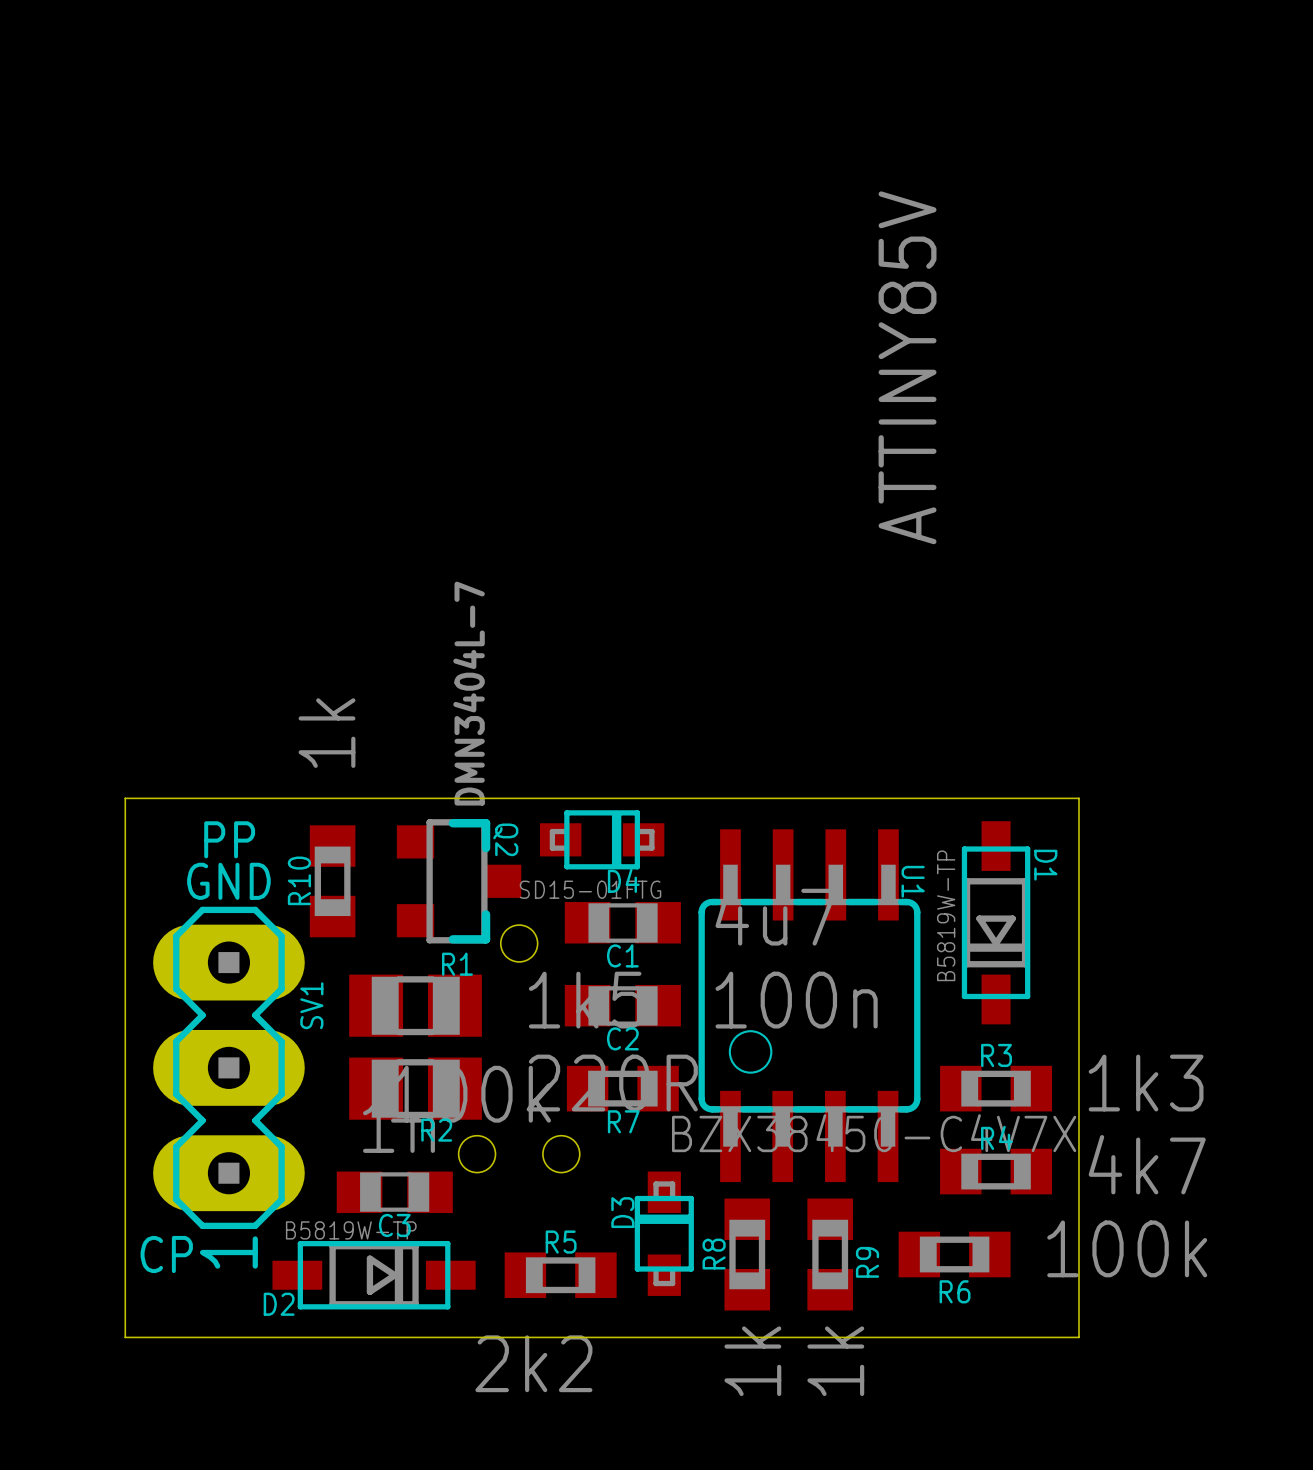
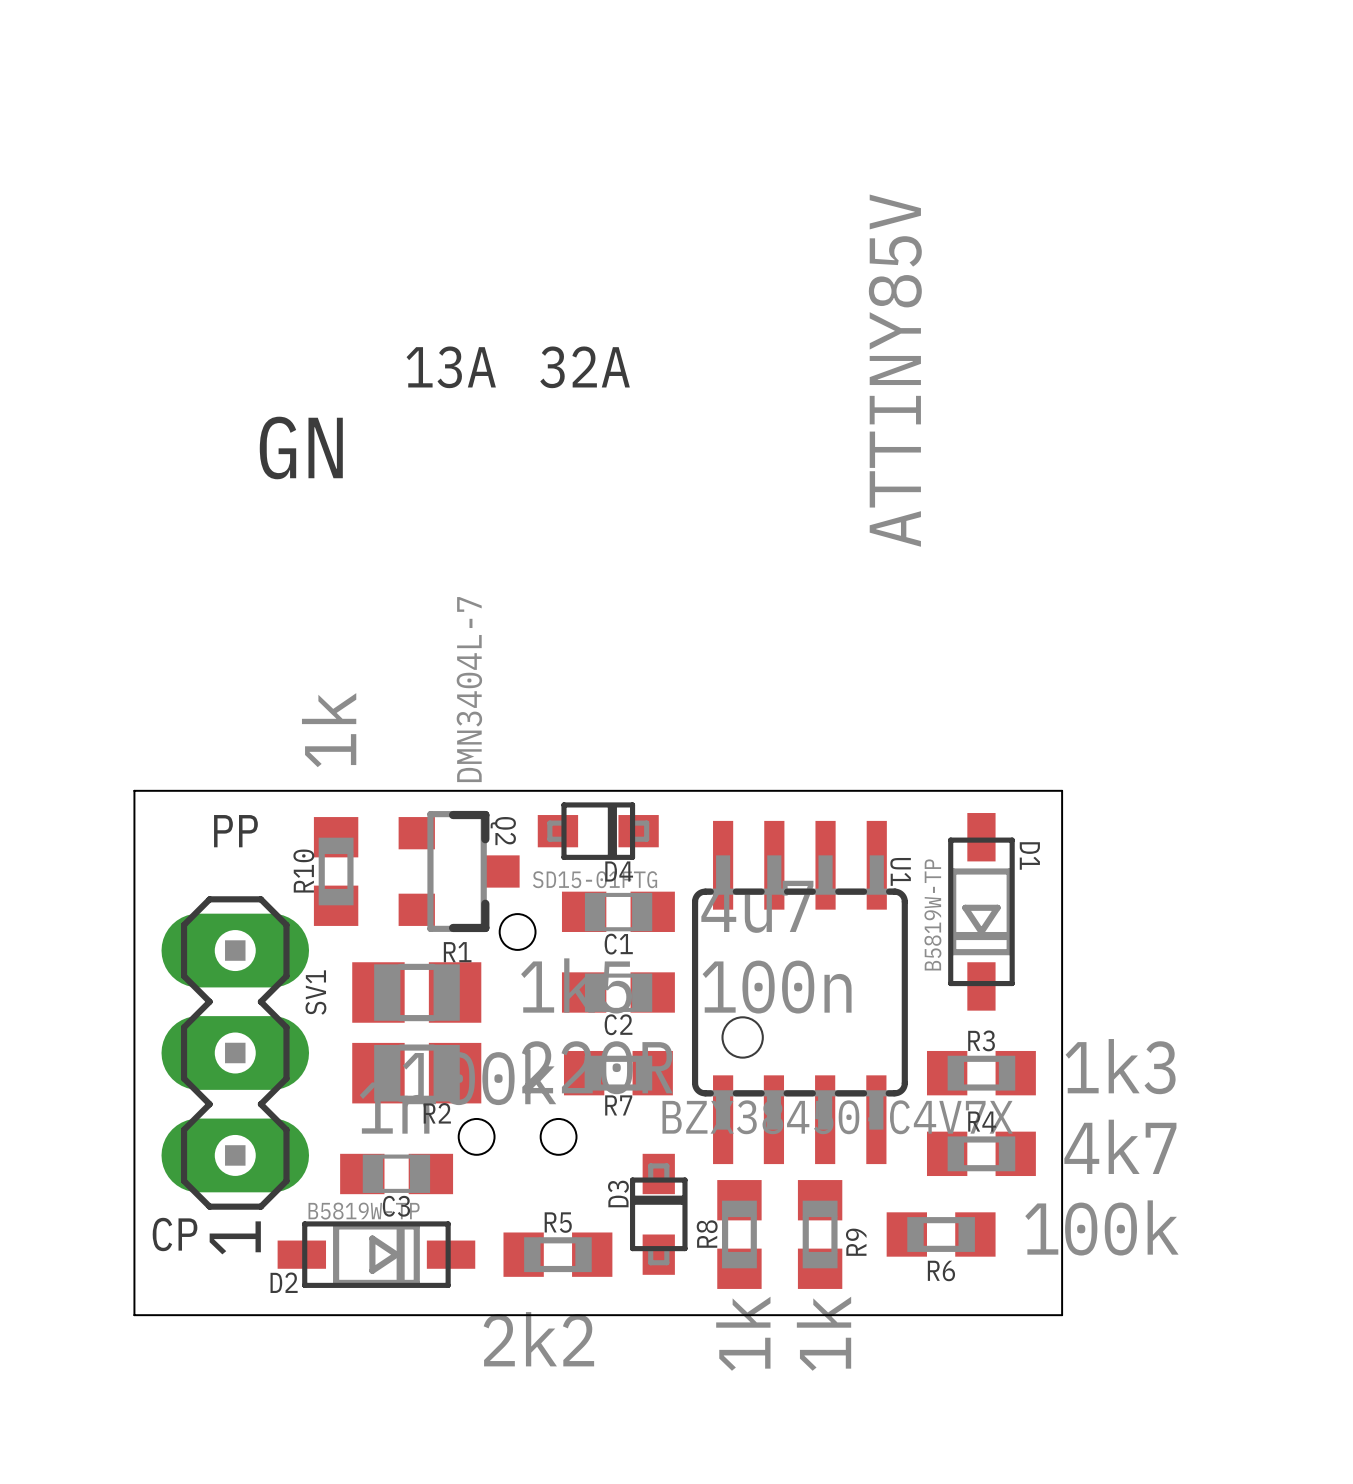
text: none -> 13A (451, 367)
text: none -> 32A (585, 367)
text: none -> GN (301, 447)
text: GND (228, 881) -> none

